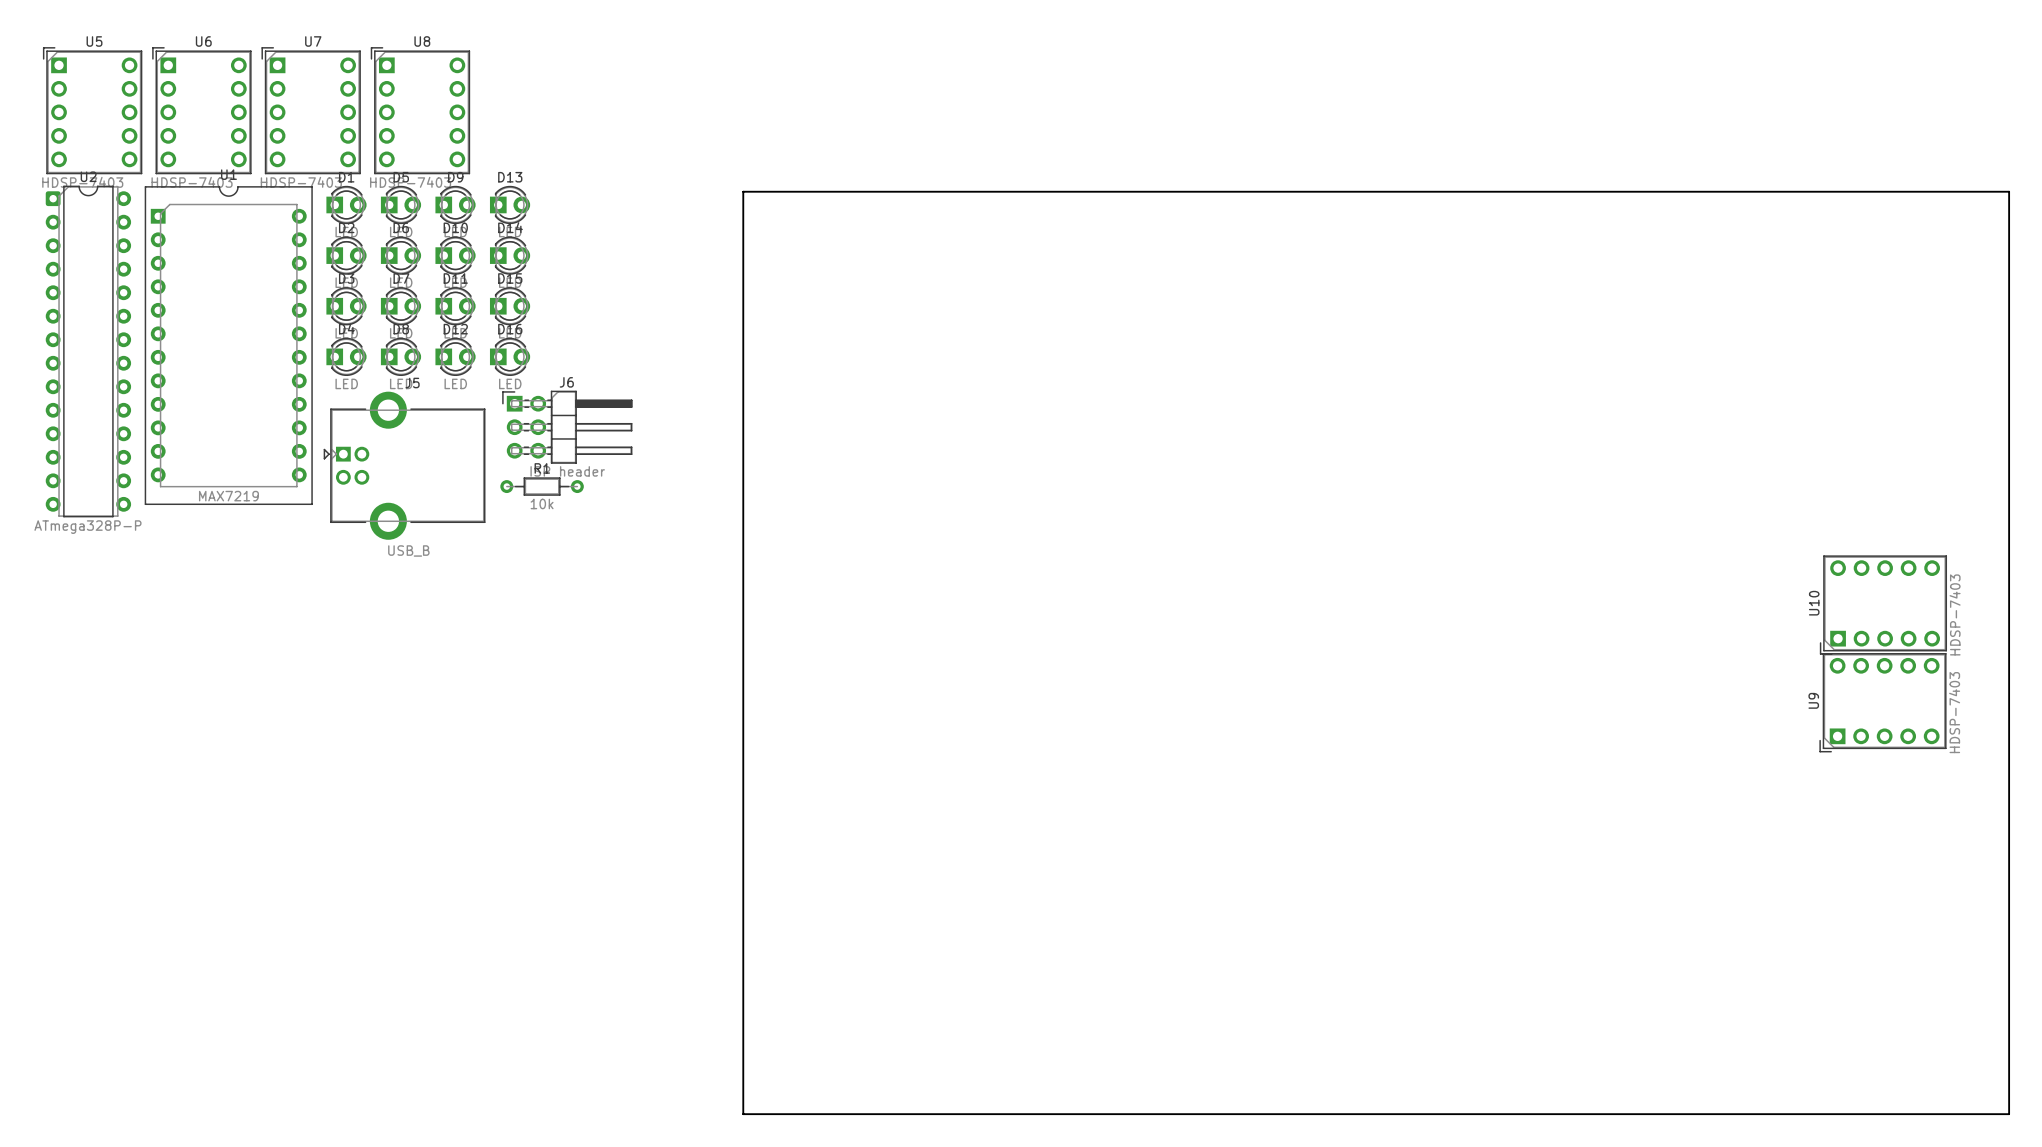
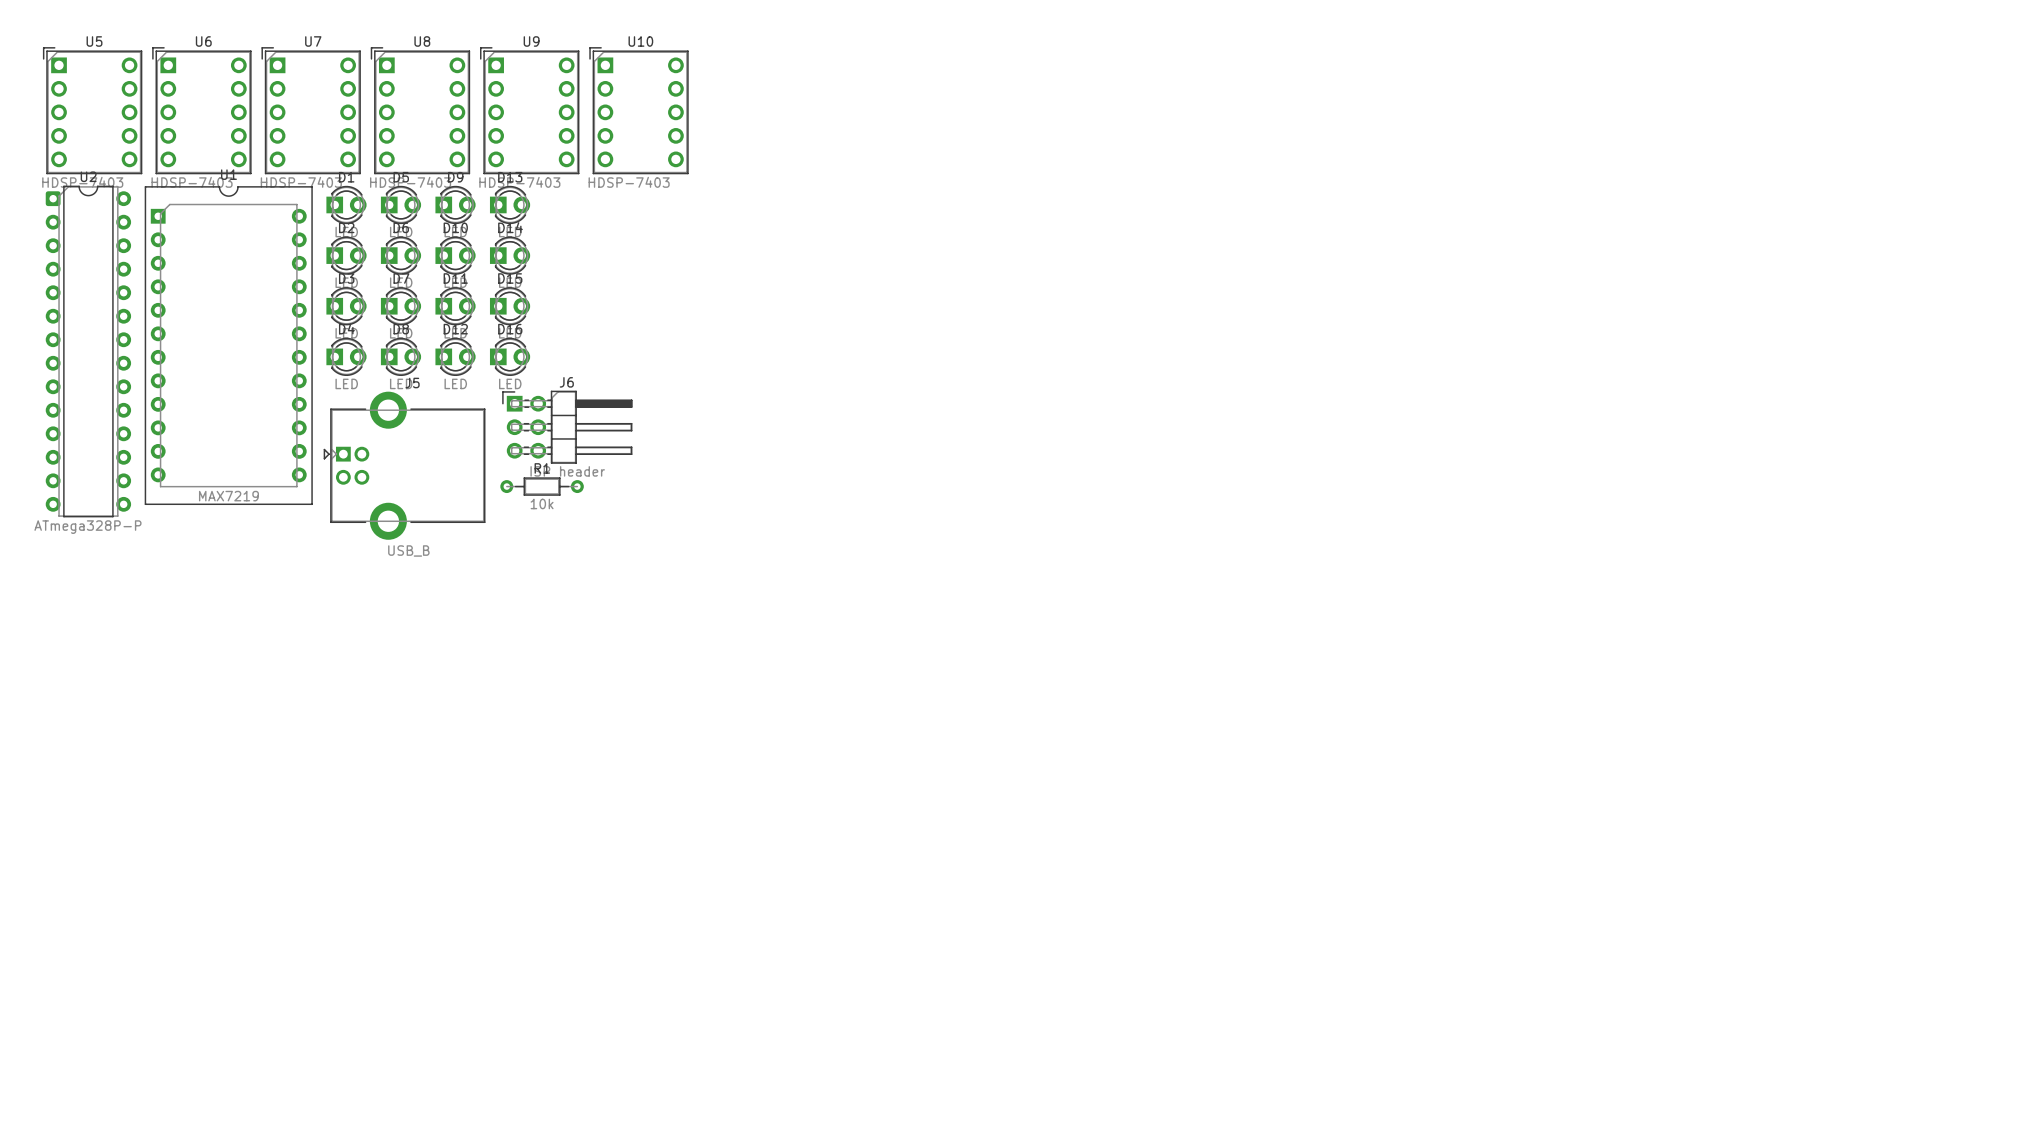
board edge: (743, 191) (2009, 191) (2009, 1114) (743, 1114) (743, 191) -> none
U10 rotation: 0° (1883, 605) -> 90° clockwise (638, 110)
U10 position: (1883, 605) -> (638, 110)
U9 rotation: 0° (1882, 702) -> 90° clockwise (529, 110)
U9 position: (1882, 702) -> (529, 110)

